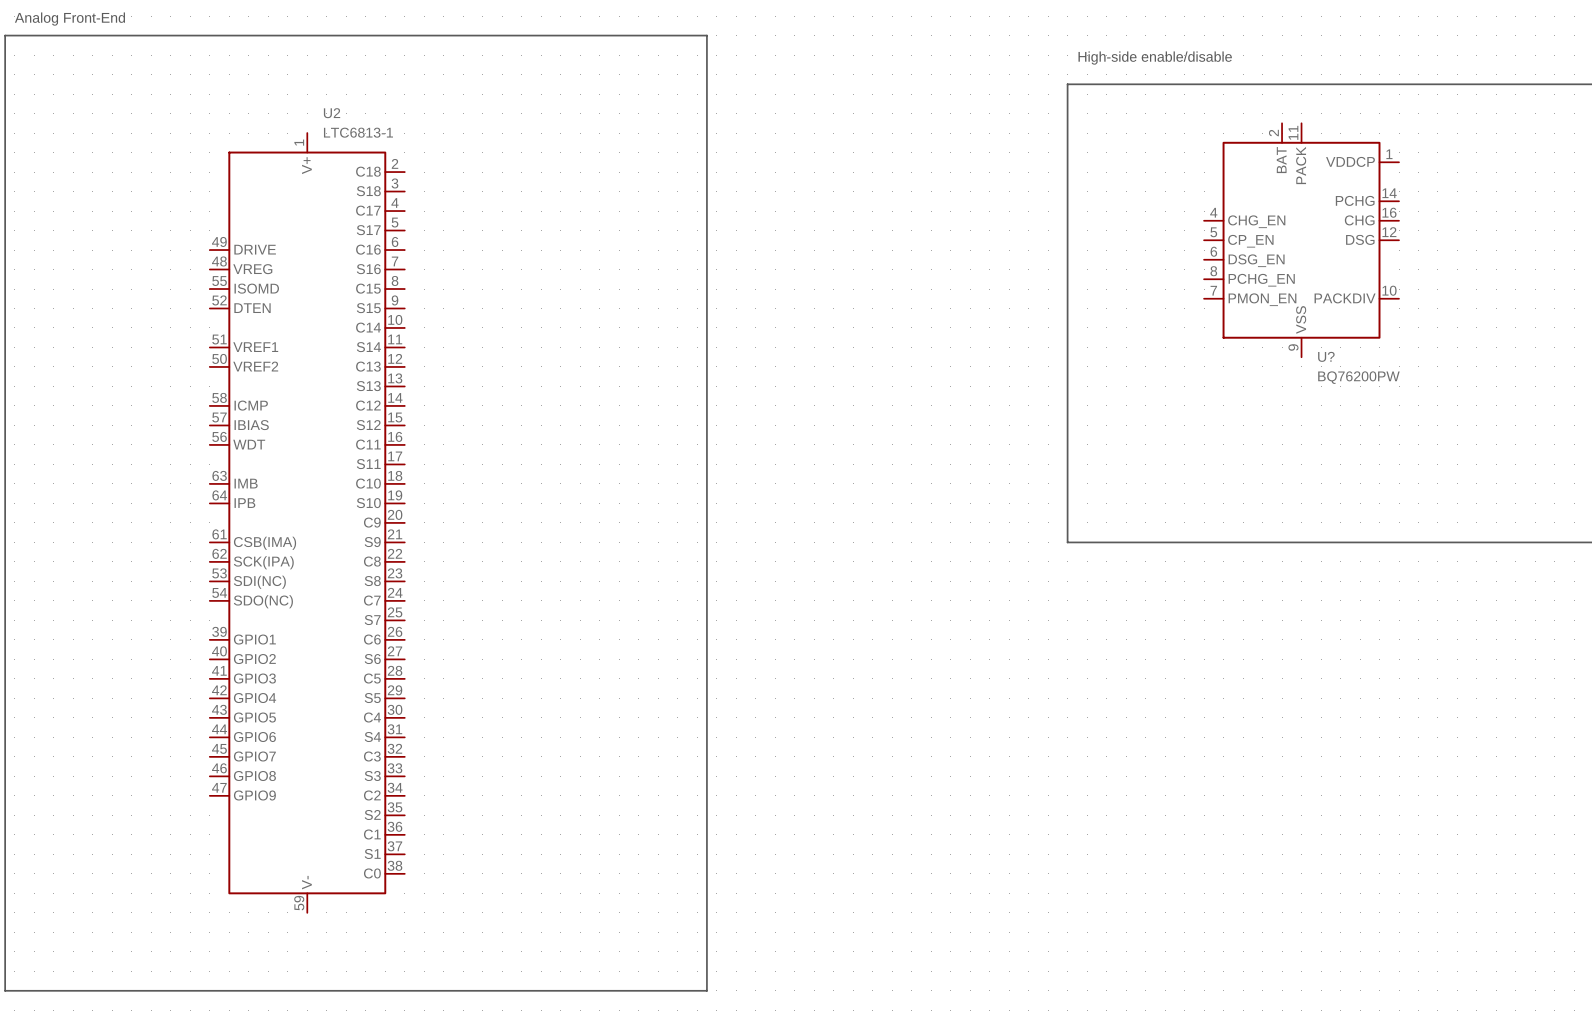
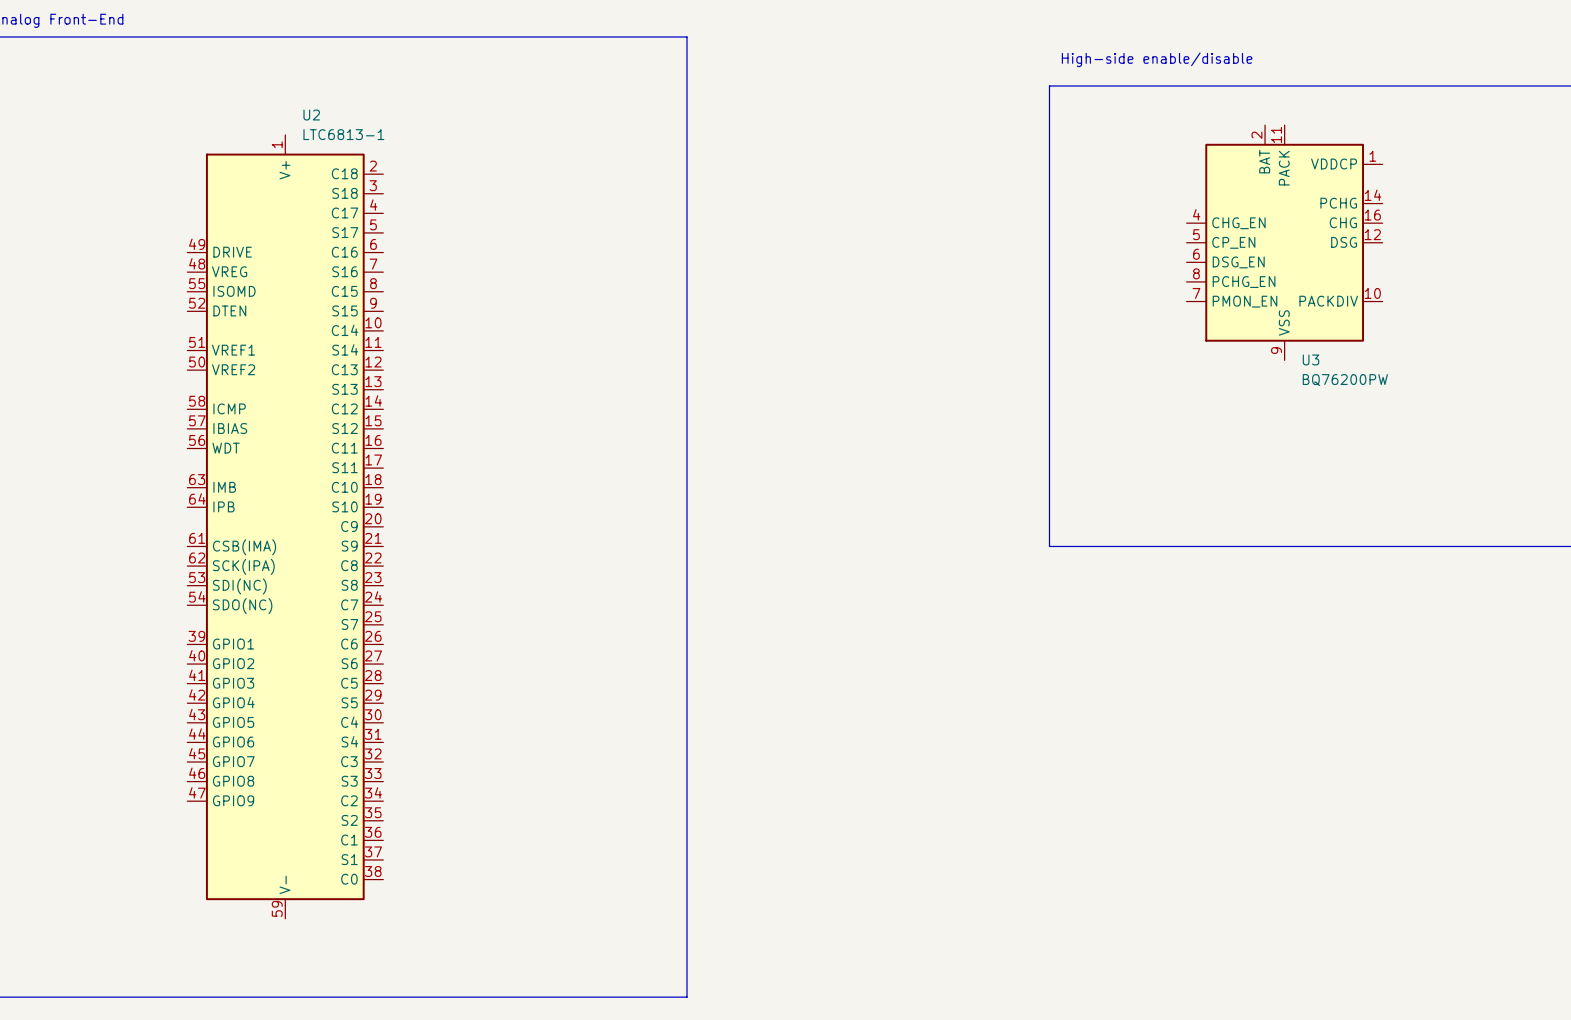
U? name: U? (1326, 356) -> U3 (1311, 359)

